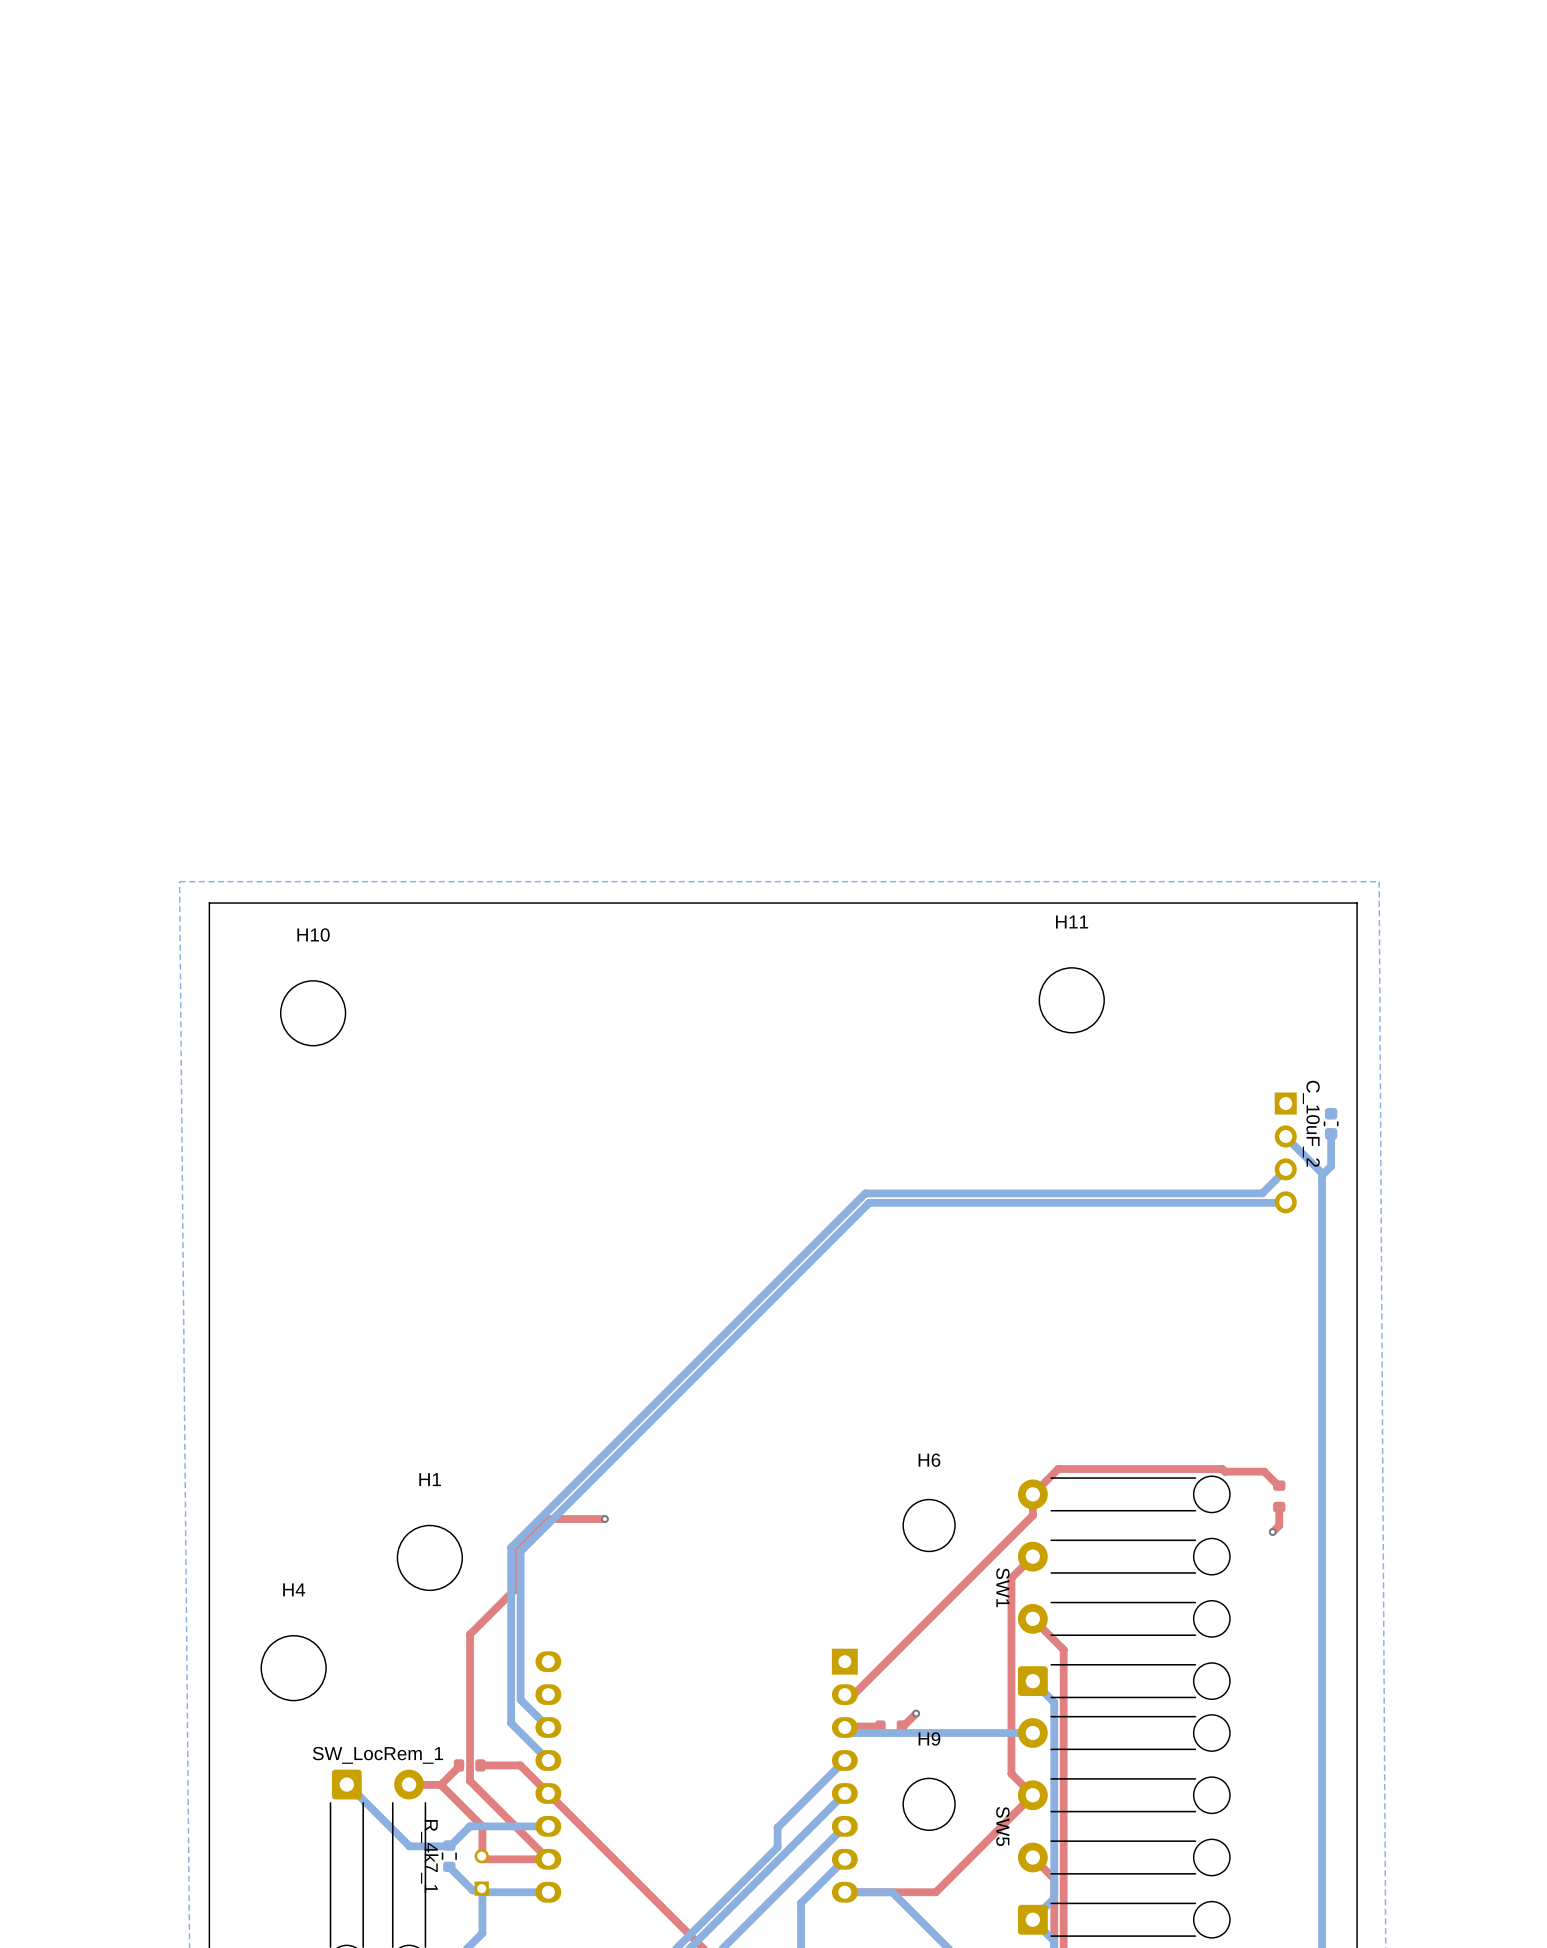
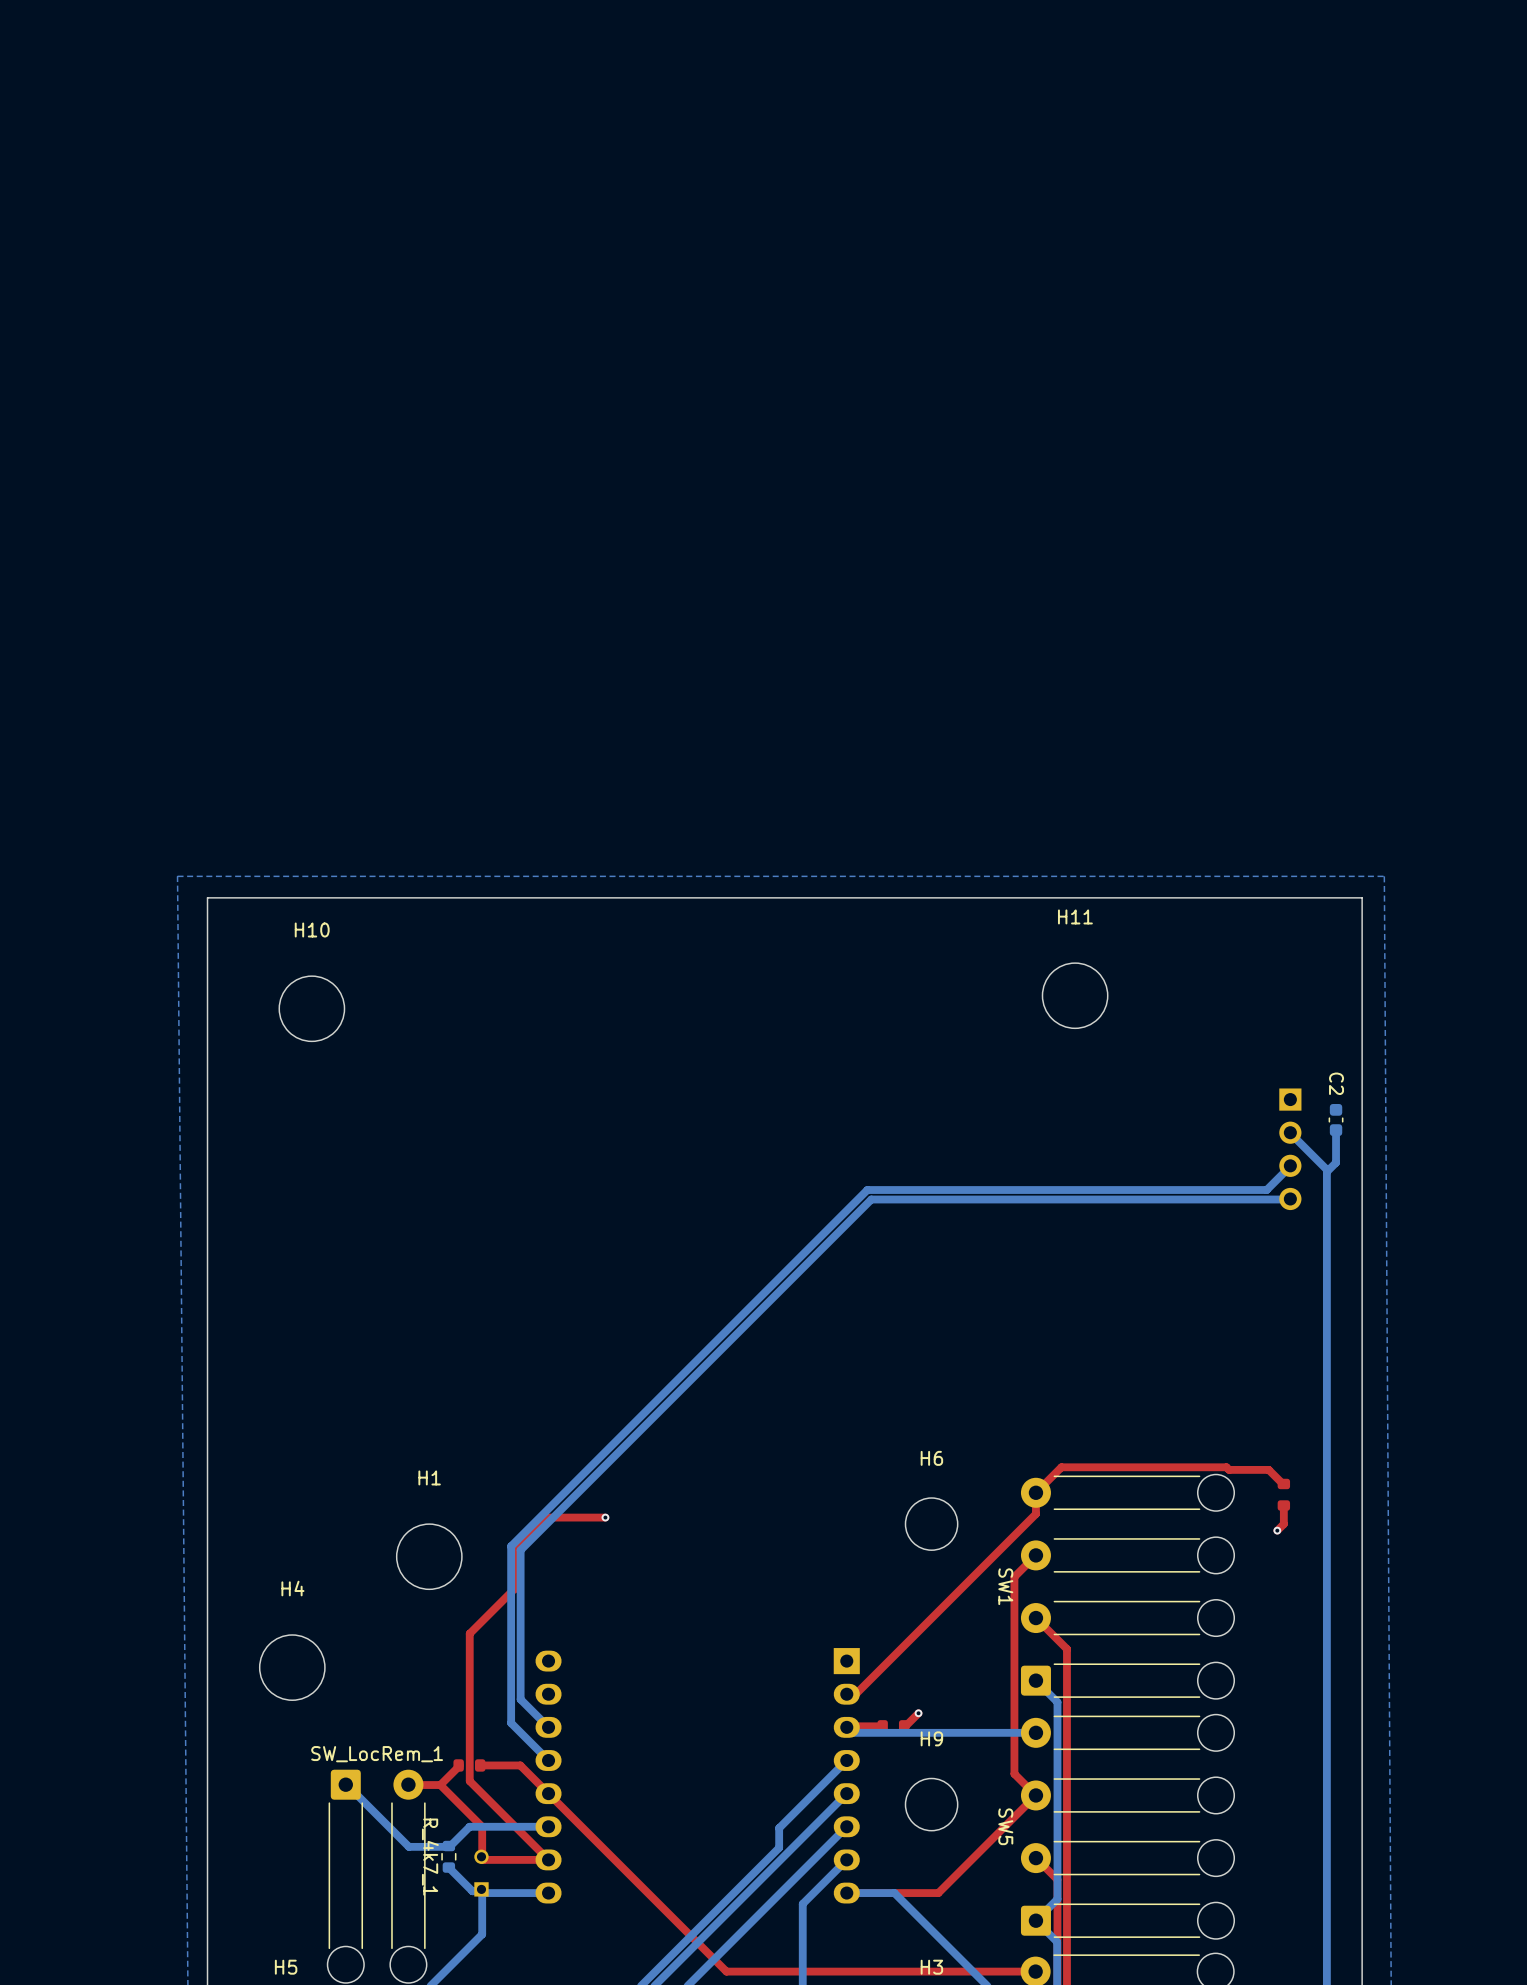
C_10uF_2 name: C_10uF_2 (1311, 1123) -> C2 (1336, 1083)

